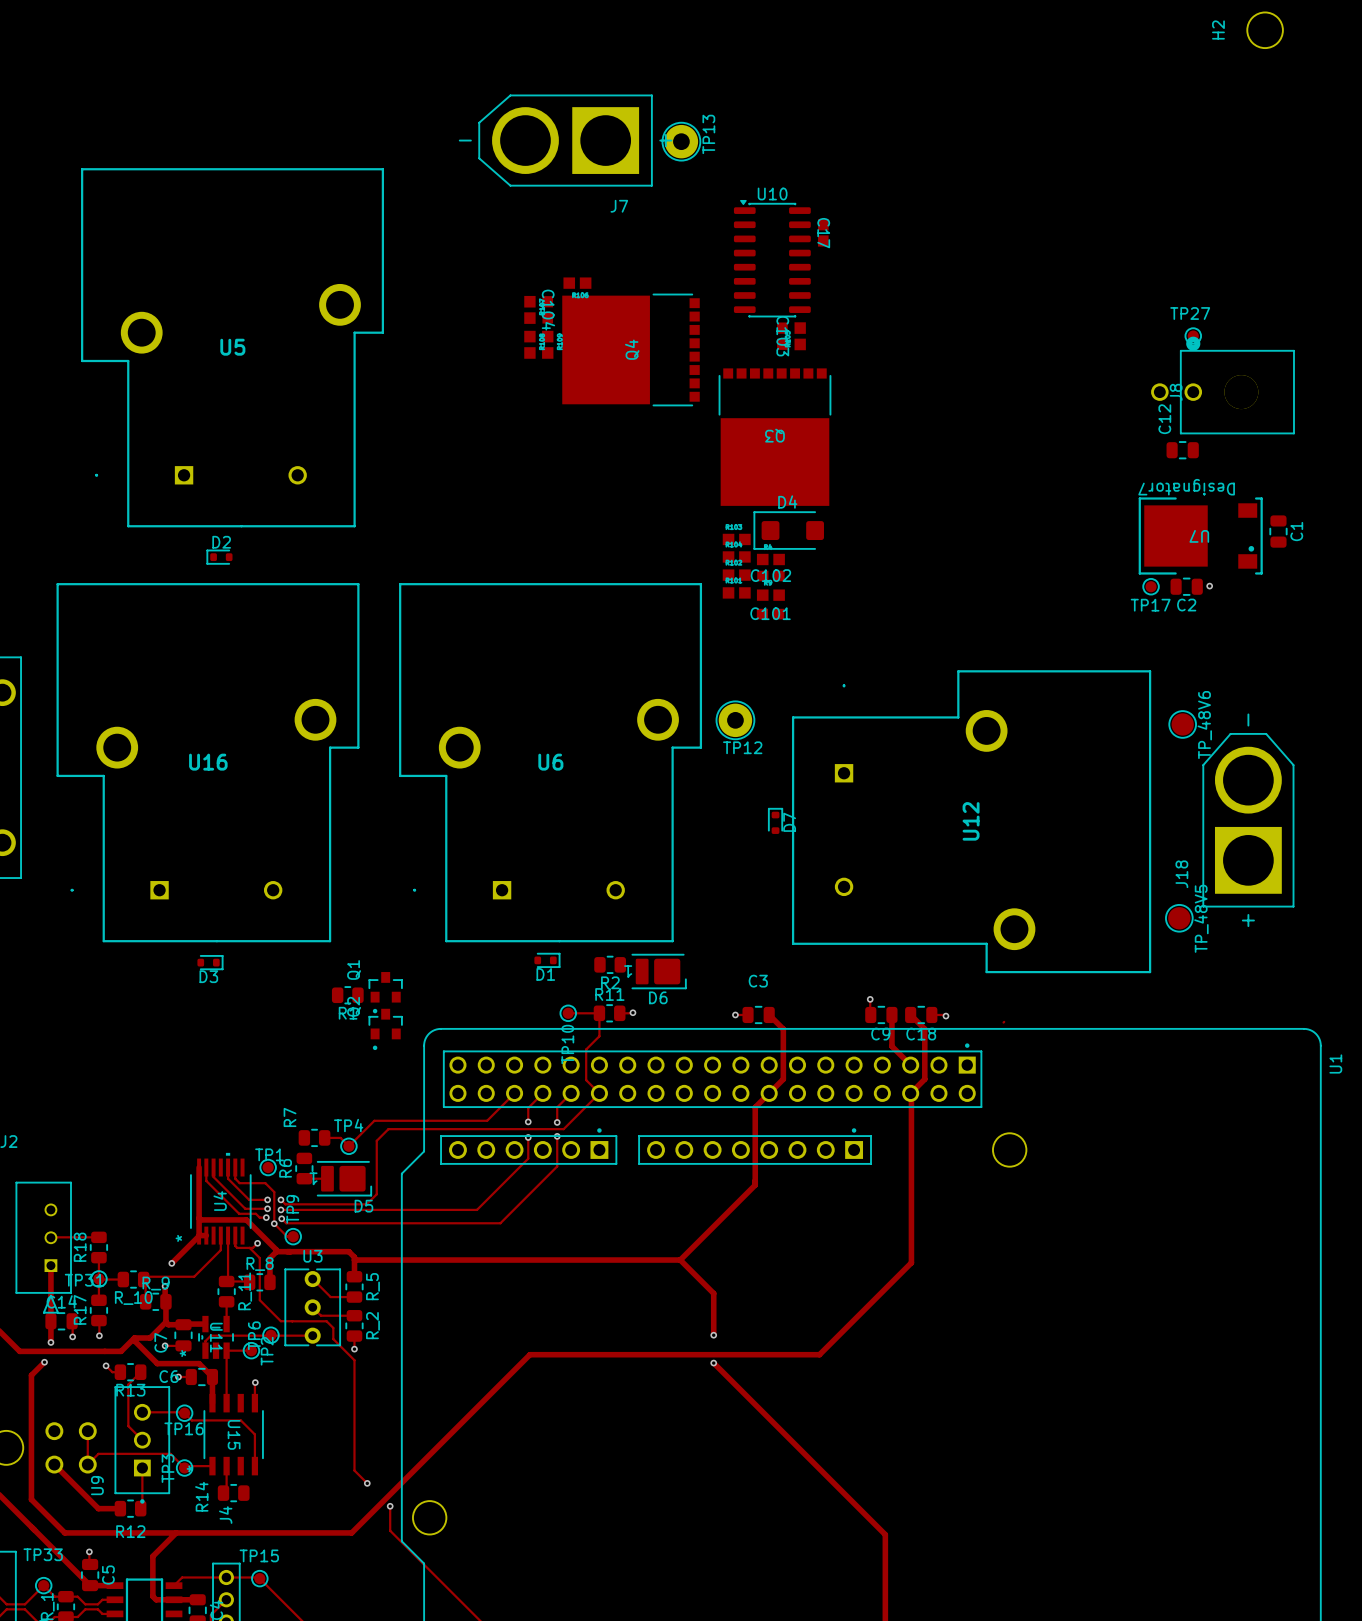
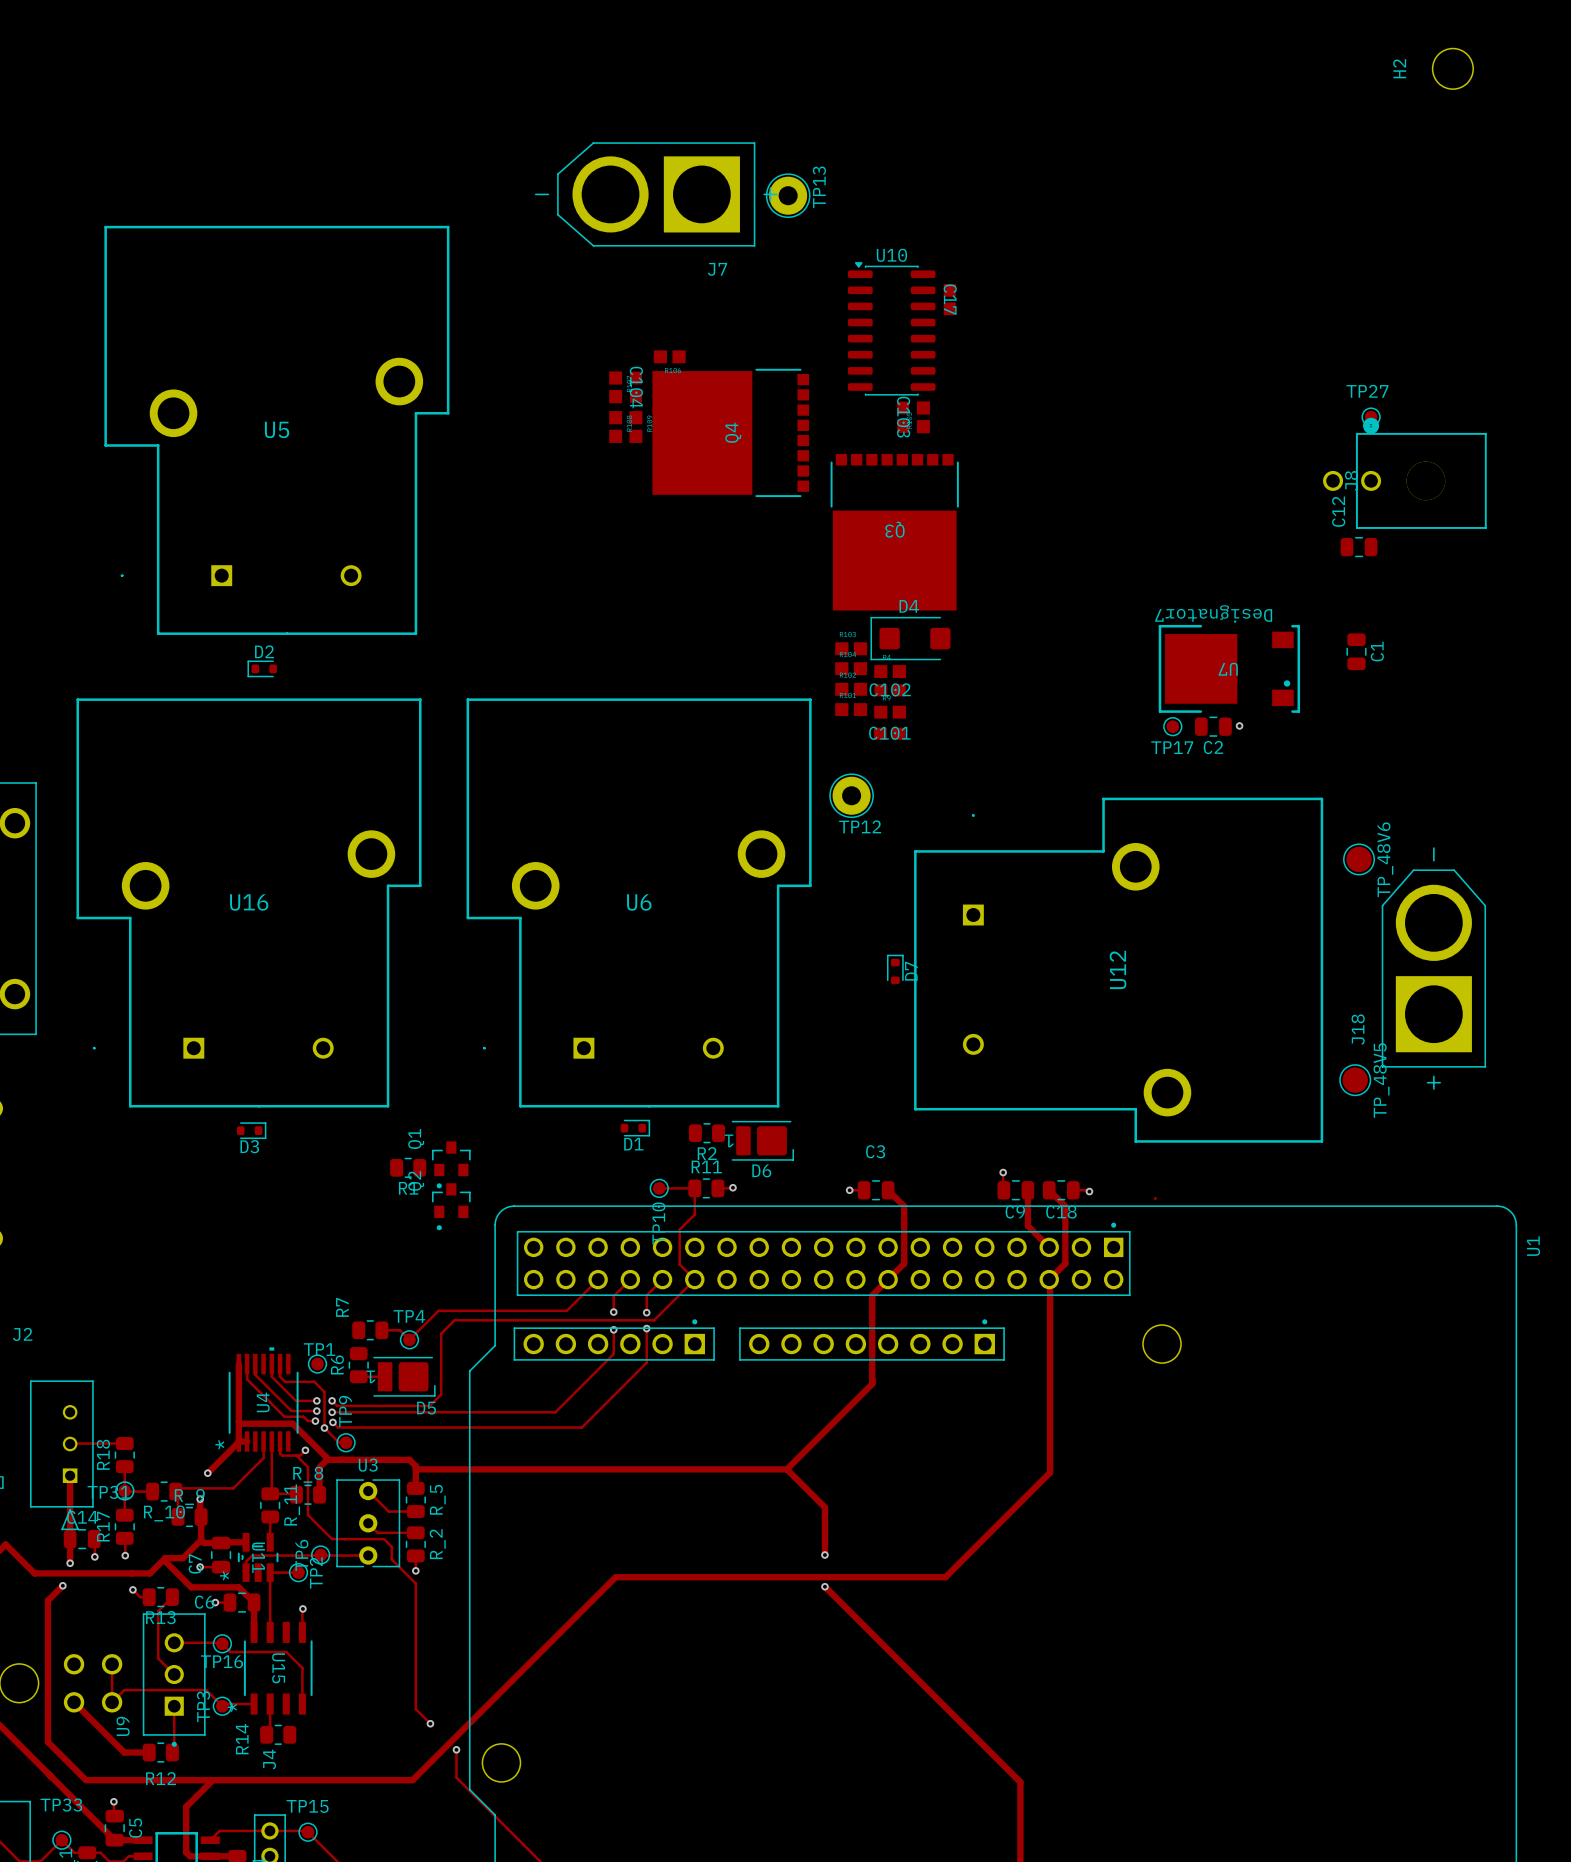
C1 position: (1278, 531) -> (1356, 651)
U7 position: (1200, 535) -> (1229, 668)
TP17 position: (1151, 586) -> (1172, 726)
C2 position: (1186, 586) -> (1213, 726)
via: (1209, 586) -> none
via: none -> (1239, 725)
TP12 position: (735, 720) -> (851, 795)

